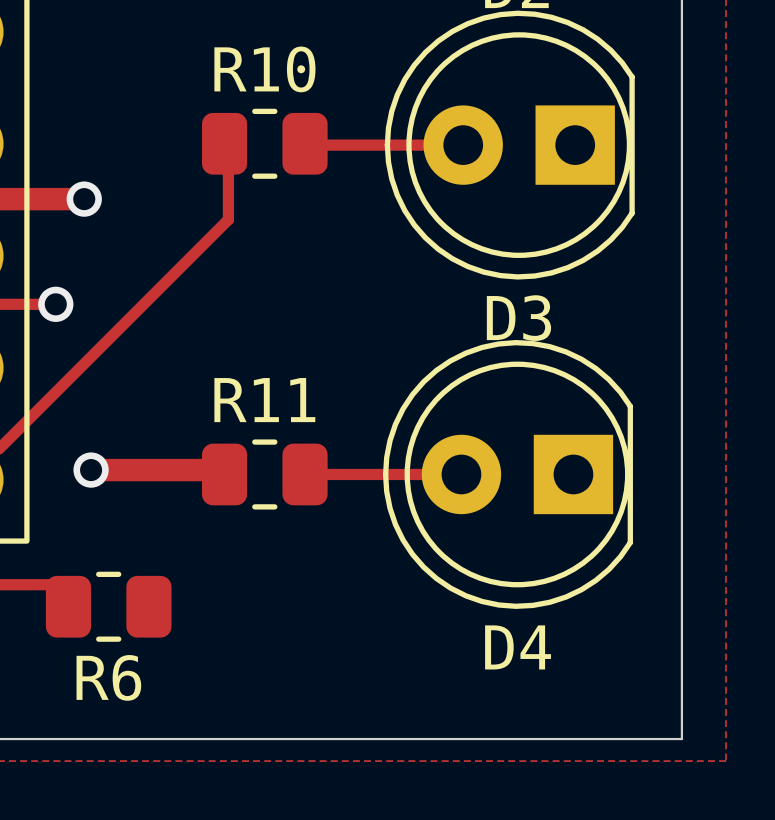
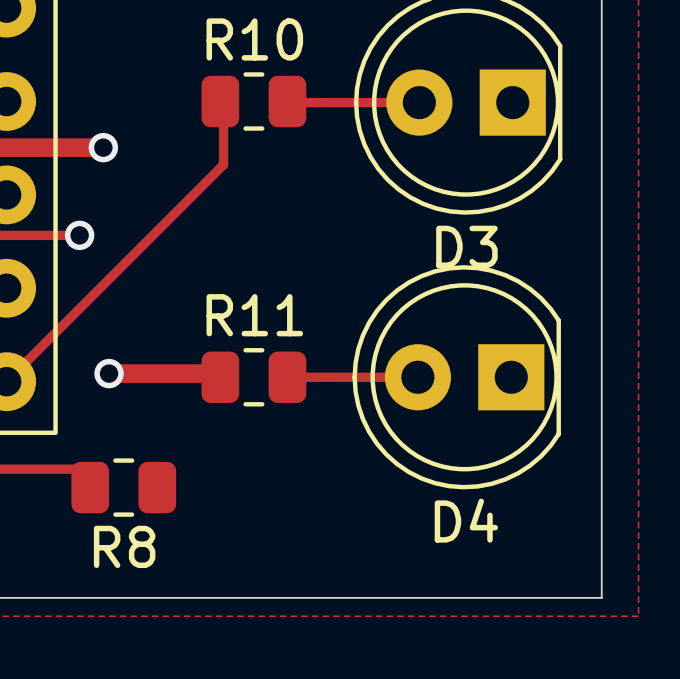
R6 name: R6 (108, 677) -> R8 (124, 546)

